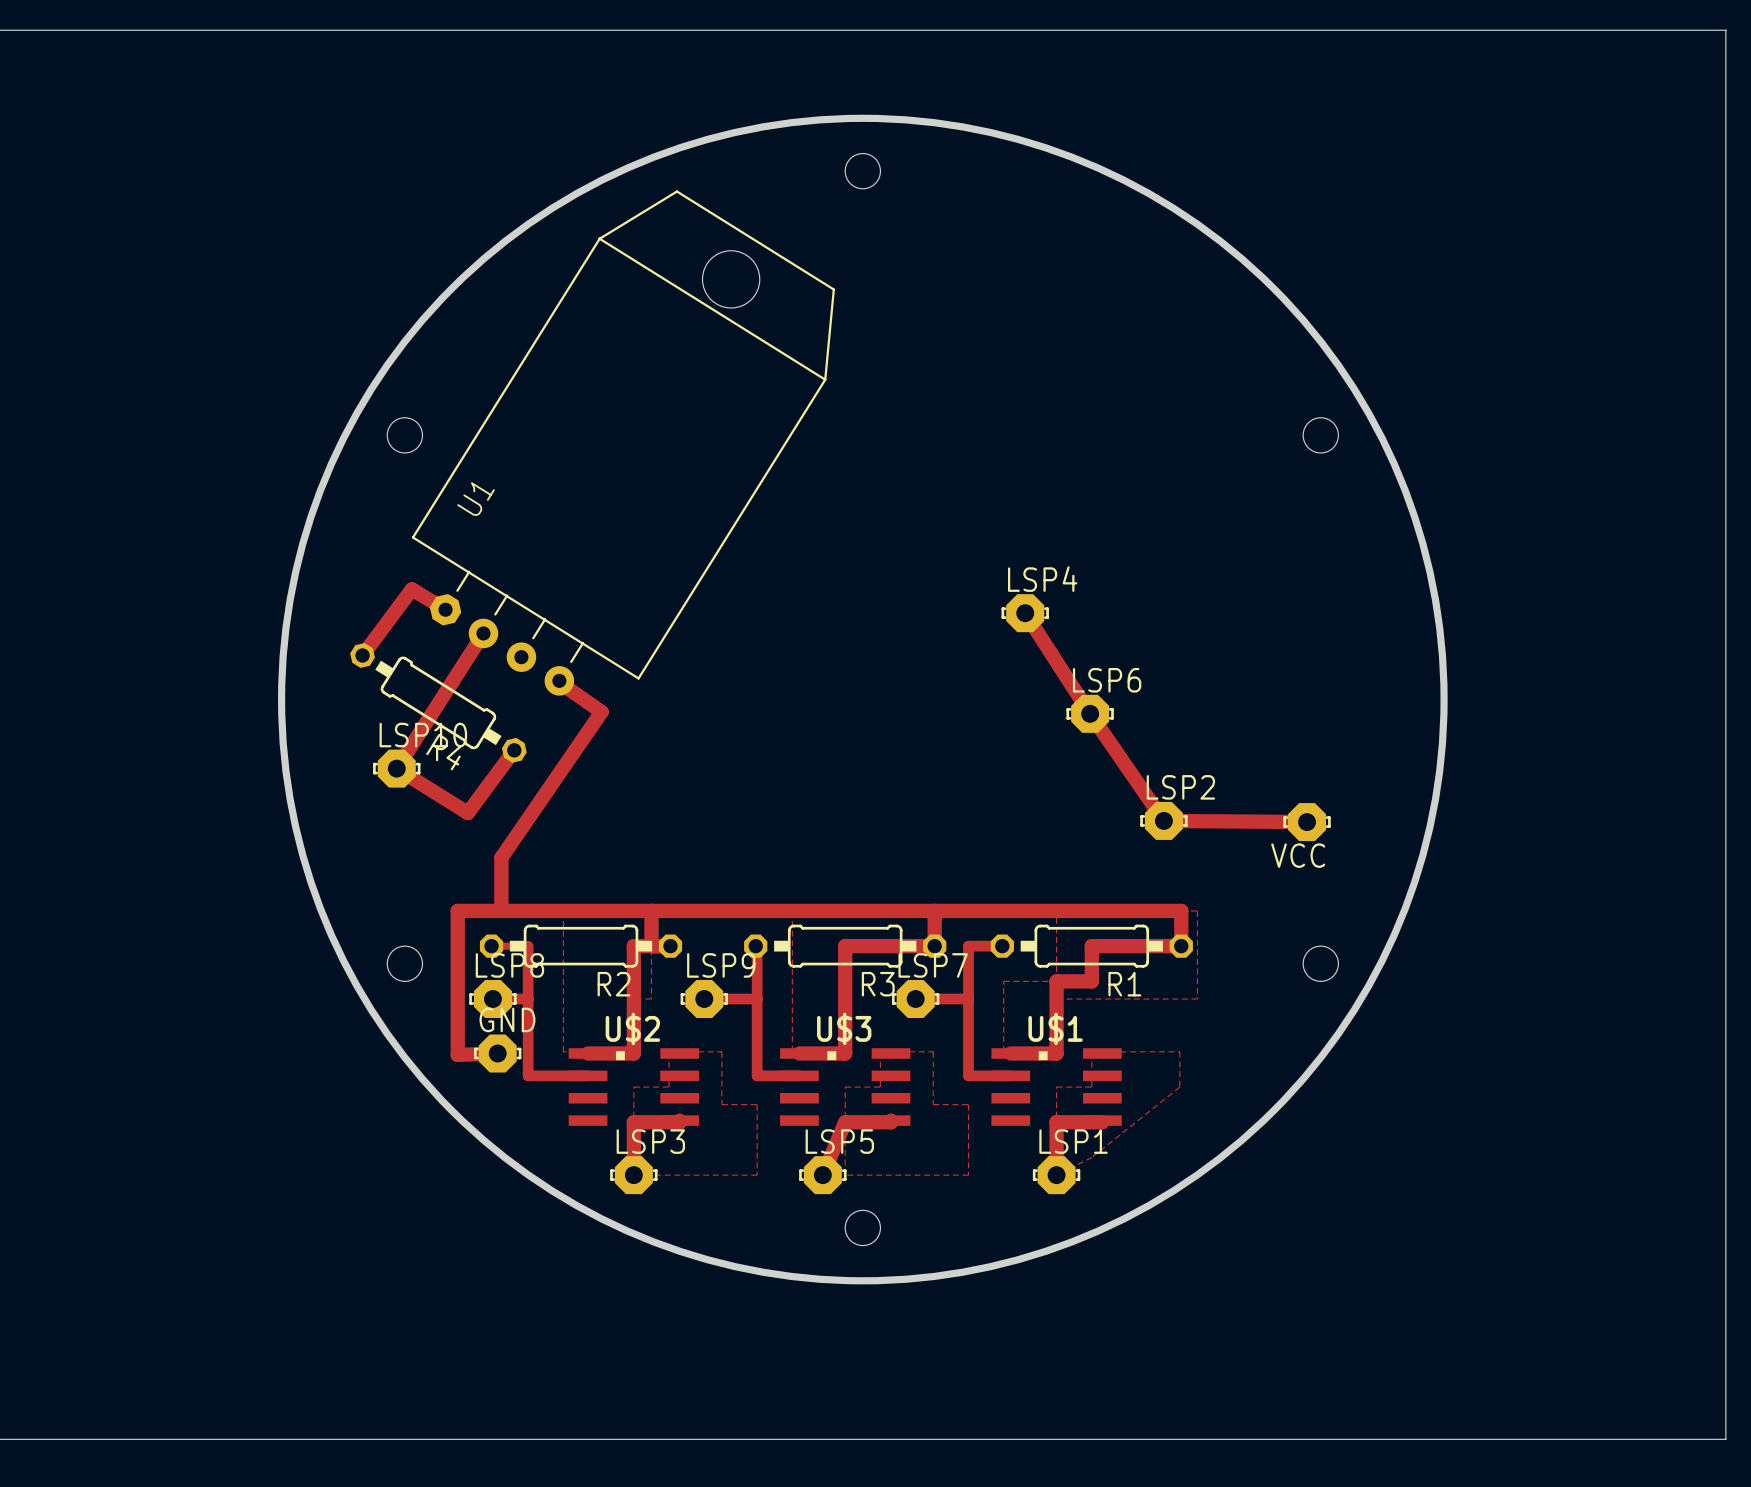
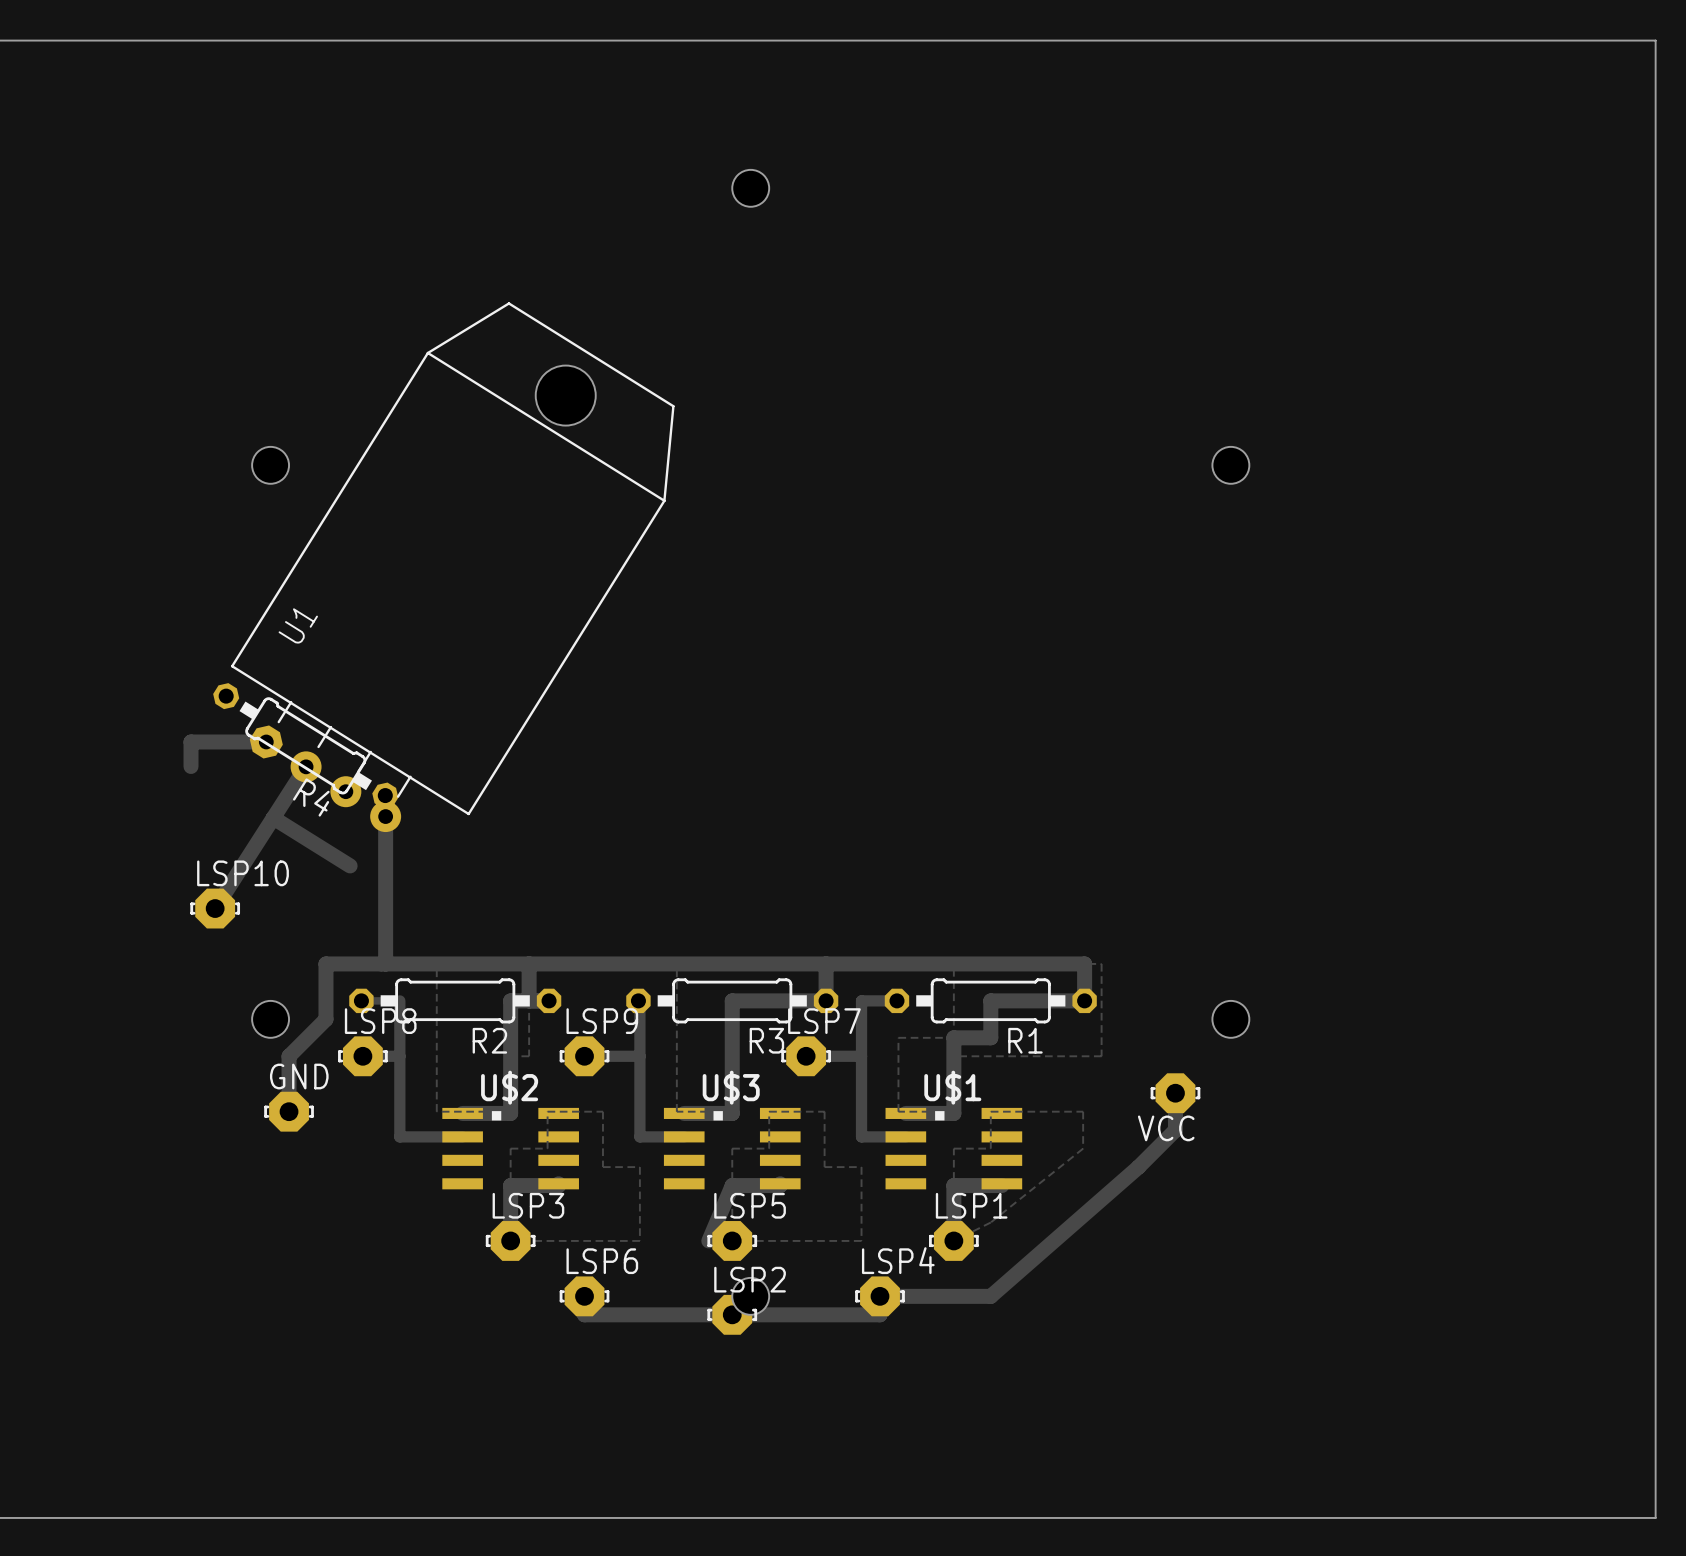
round board edge: [278, 114, 1448, 1285] -> none
U1 position: (623, 443) -> (452, 567)
track: (445, 609) (411, 589) (362, 655) -> none
track: (1025, 613) (1090, 713) (1163, 820) (1307, 822) -> none
LSP4 position: (1025, 613) -> (879, 1296)
track: (483, 633) (396, 768) (467, 812) (514, 750) -> none
track: (557, 680) (601, 712) (501, 857) (501, 910) -> none
track: none -> (266, 741) (191, 741) (191, 766)
LSP6 position: (1090, 713) -> (584, 1296)
track: none -> (306, 766) (215, 908)
LSP10 position: (396, 768) -> (215, 908)
track: none -> (385, 816) (385, 963)
track: none -> (273, 817) (350, 865)
LSP2 position: (1163, 820) -> (732, 1314)
VCC position: (1307, 822) -> (1175, 1093)
track: (457, 963) (457, 1054) (497, 1053) -> (325, 1019) (289, 1056) (289, 1111)
track: none -> (1175, 1093) (1175, 1130) (1138, 1167) (990, 1296) (879, 1296) (879, 1314) (584, 1314) (584, 1296)
GND position: (497, 1053) -> (289, 1111)
LSP5 position: (822, 1175) -> (732, 1240)

